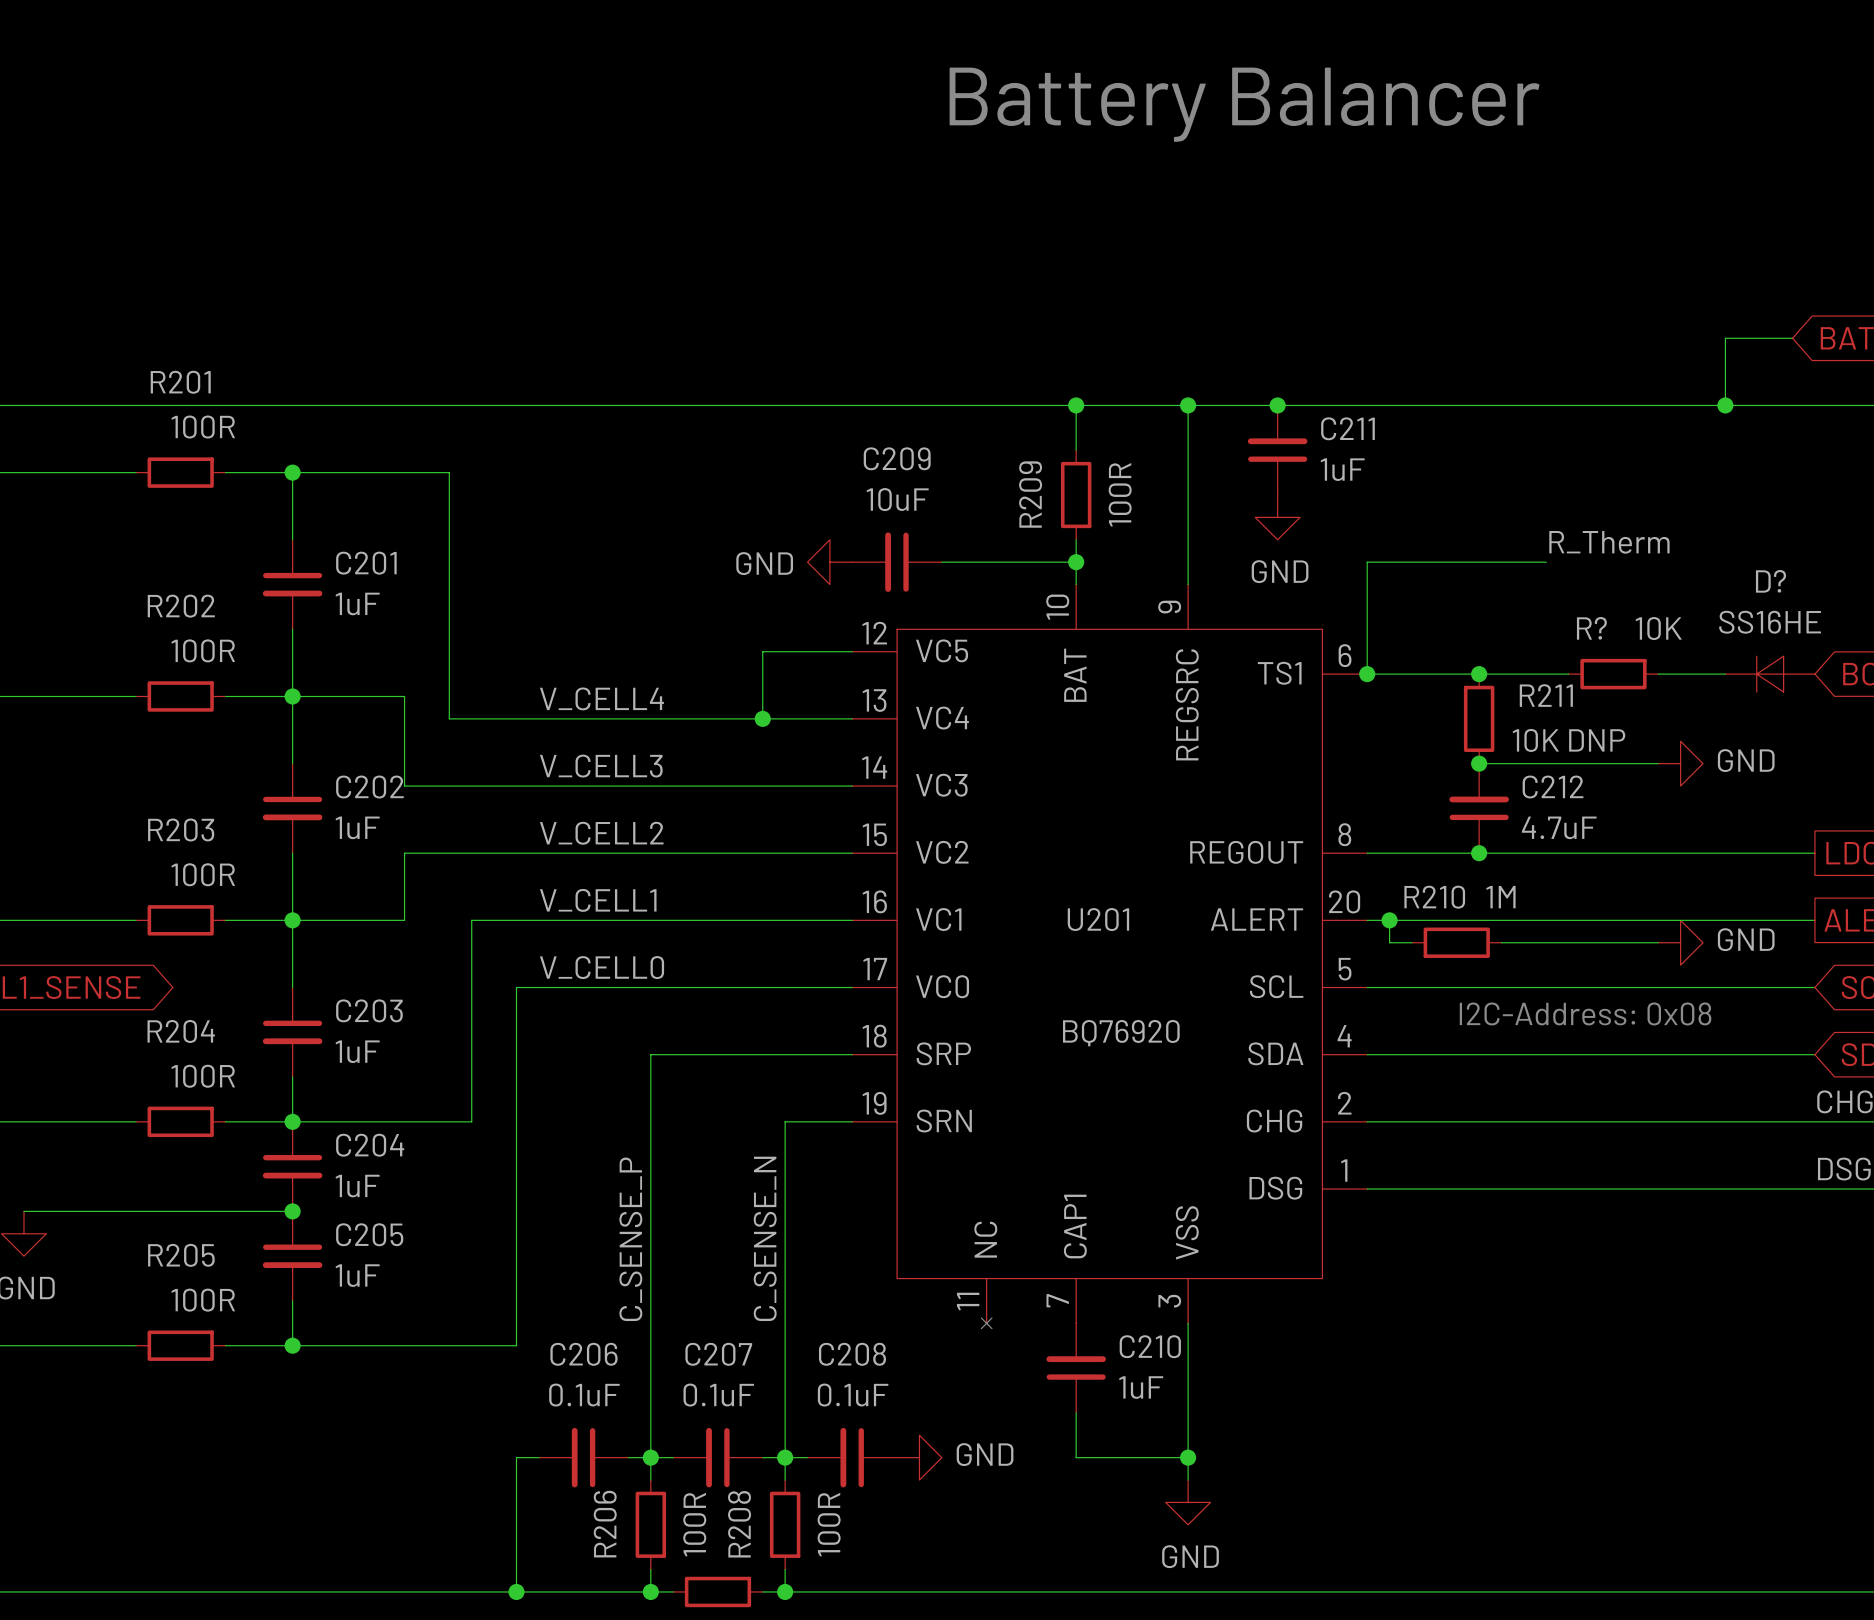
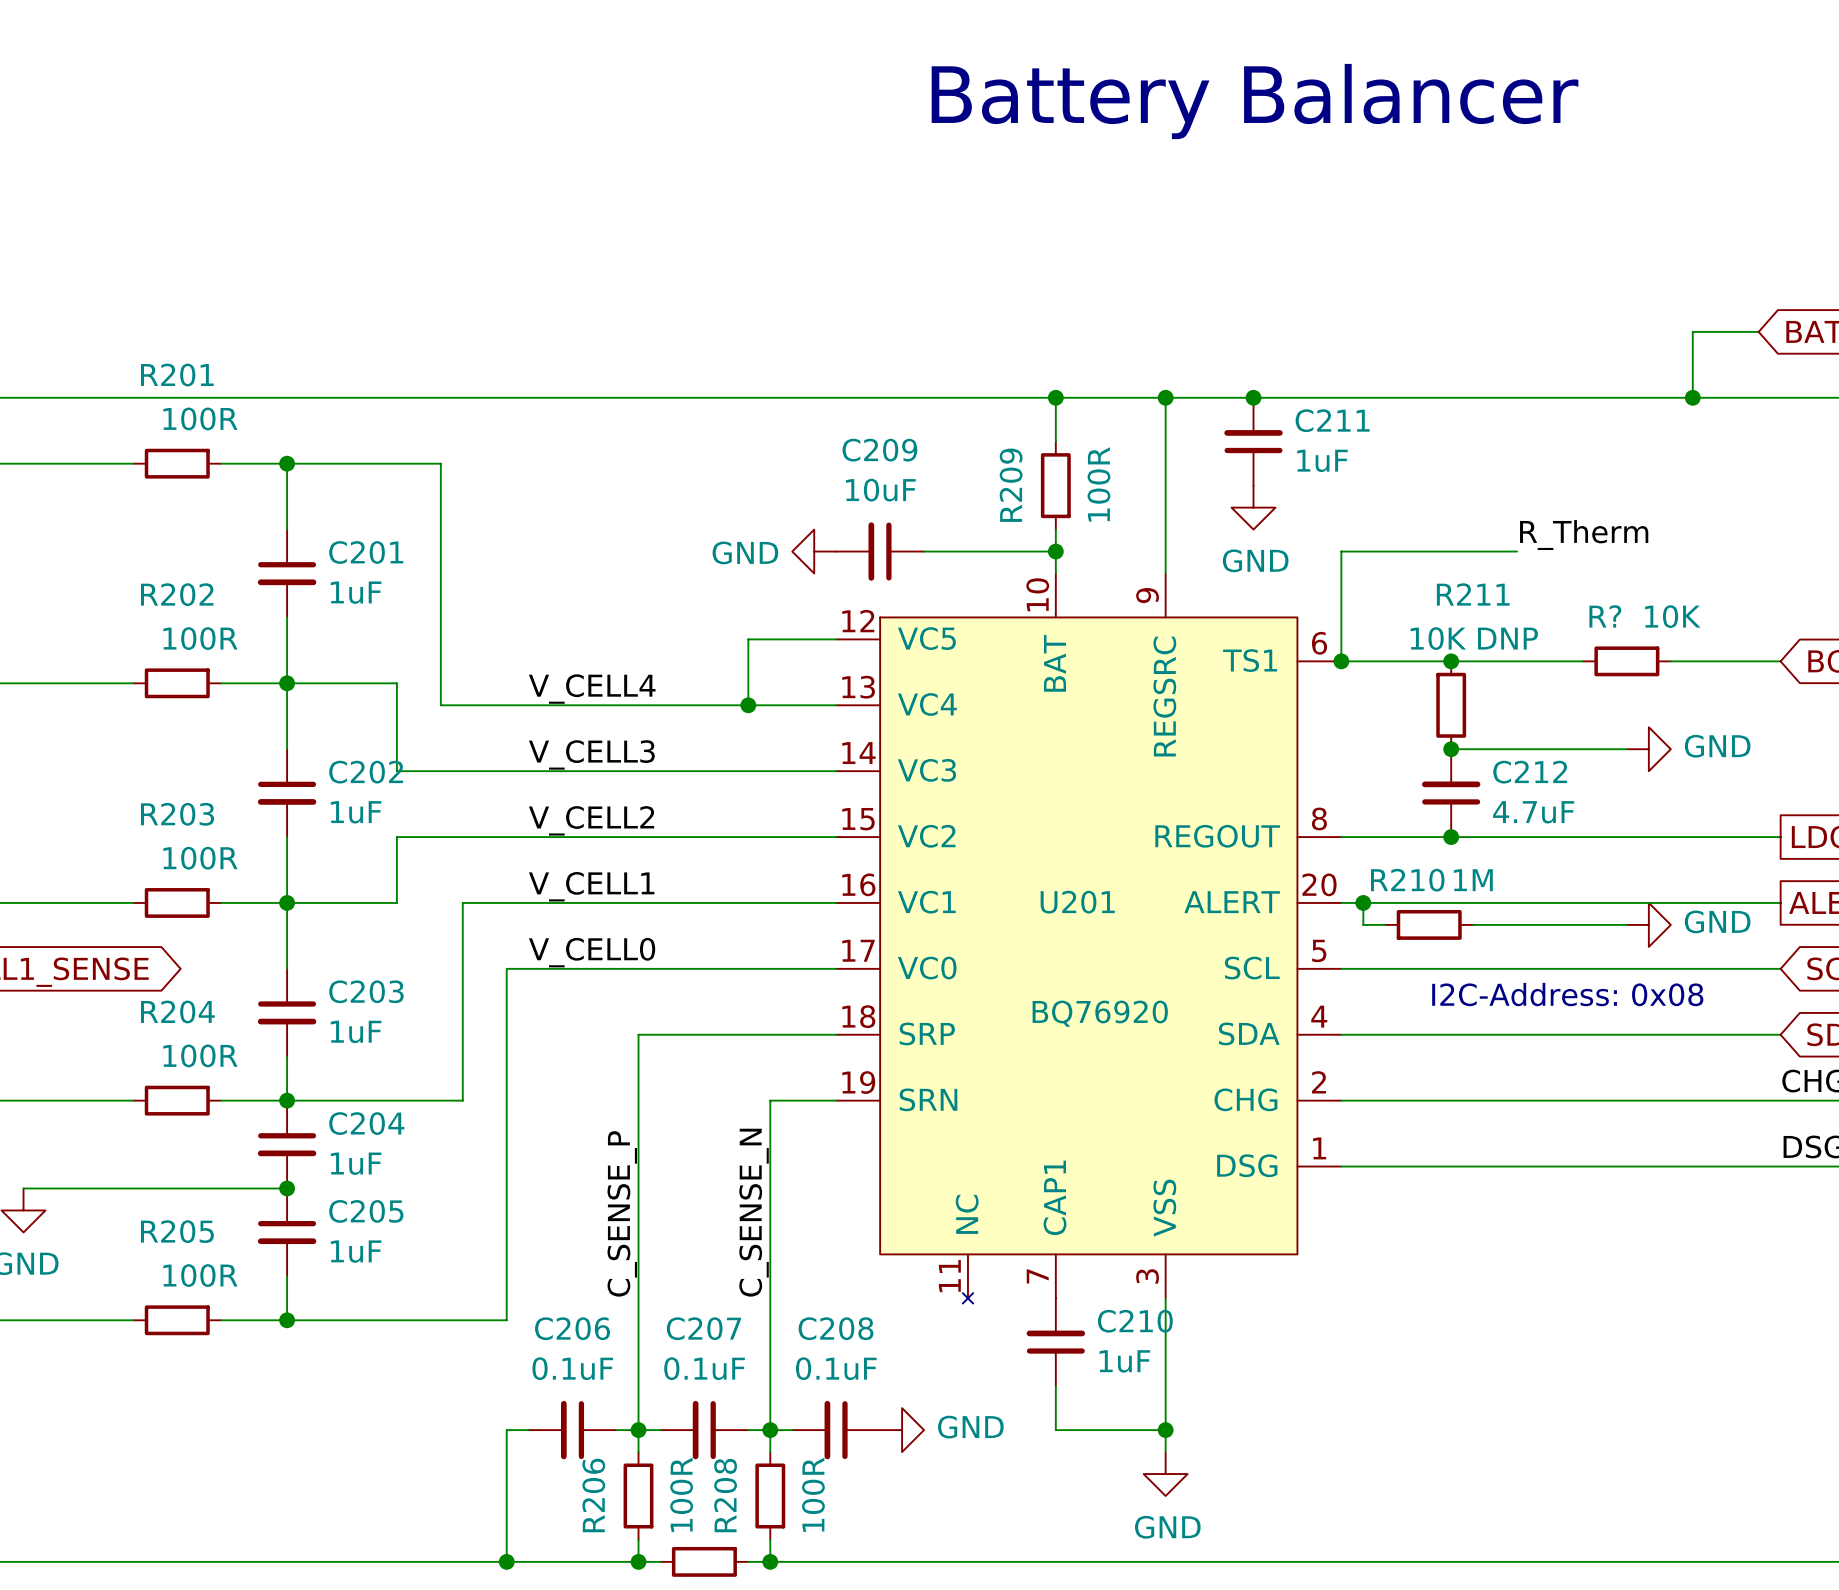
R? position: (1613, 674) -> (1626, 661)
wire: (1658, 674) (1703, 674) -> (1539, 661) (1582, 661)
D?: SS16HE (1770, 674) -> none
R211 name position: R211 (1546, 695) -> R211 (1473, 594)
R211 value position: 10K DNP (1569, 740) -> 10K DNP (1474, 638)

